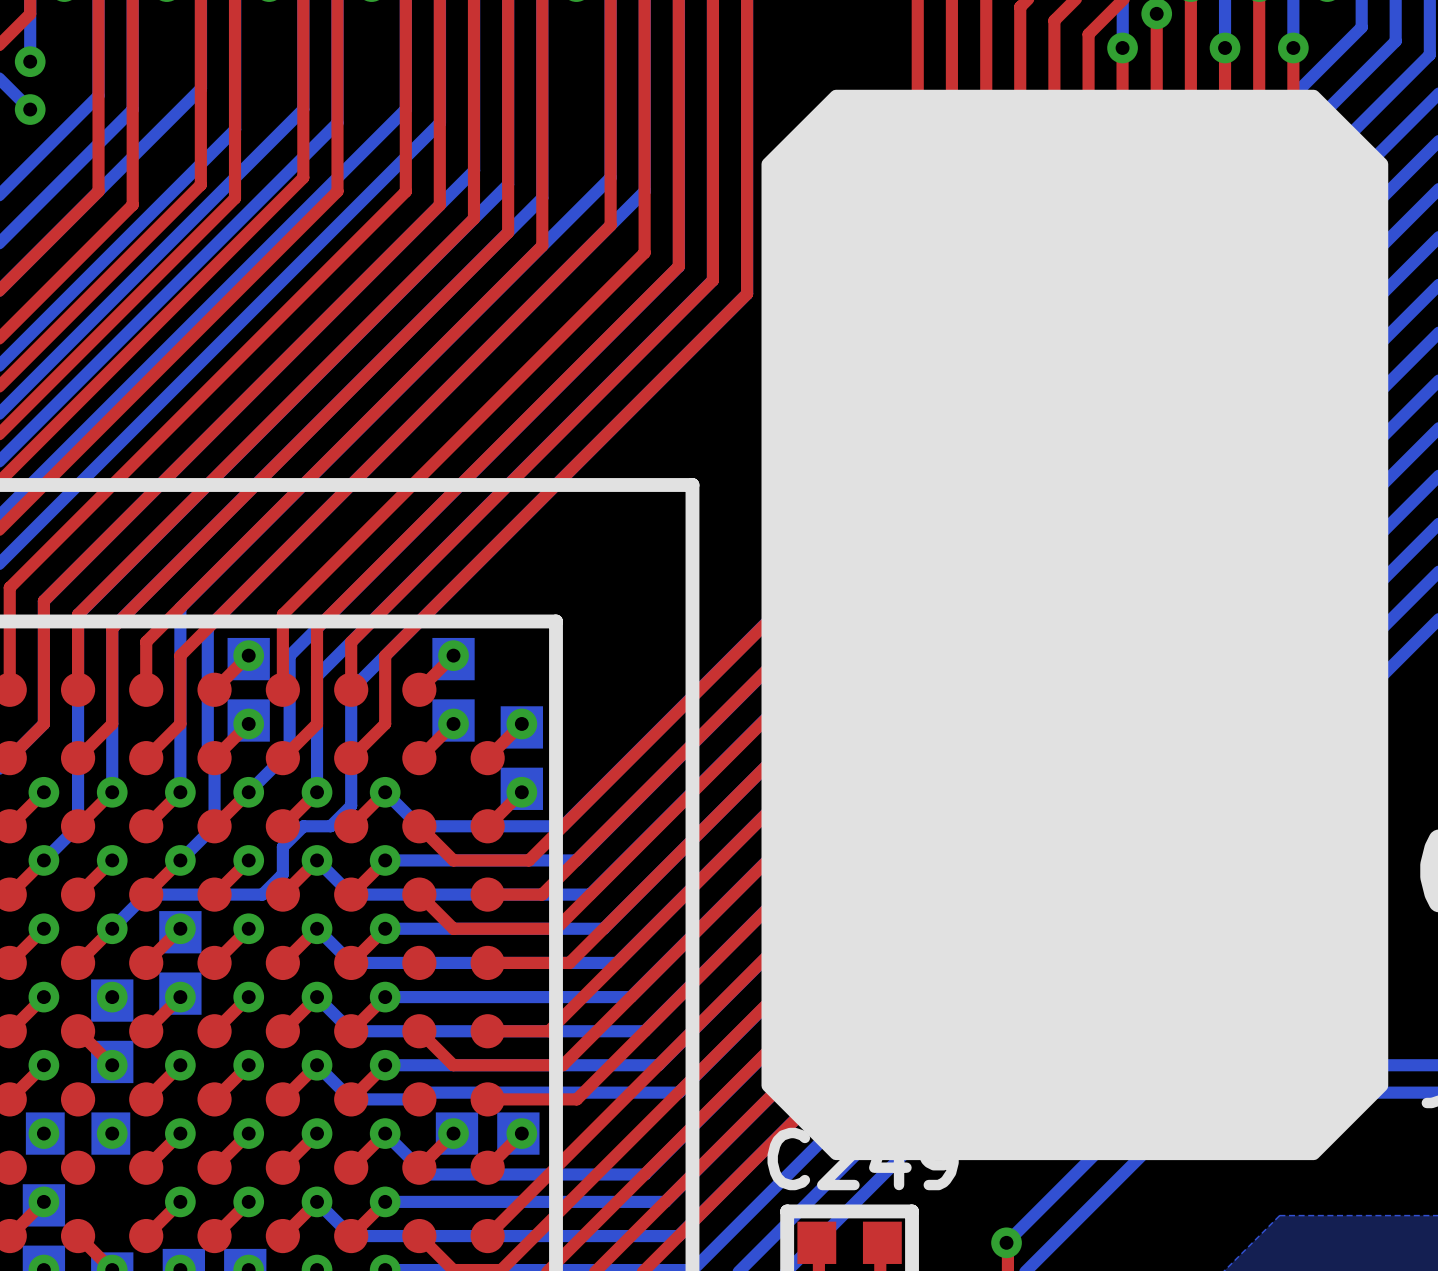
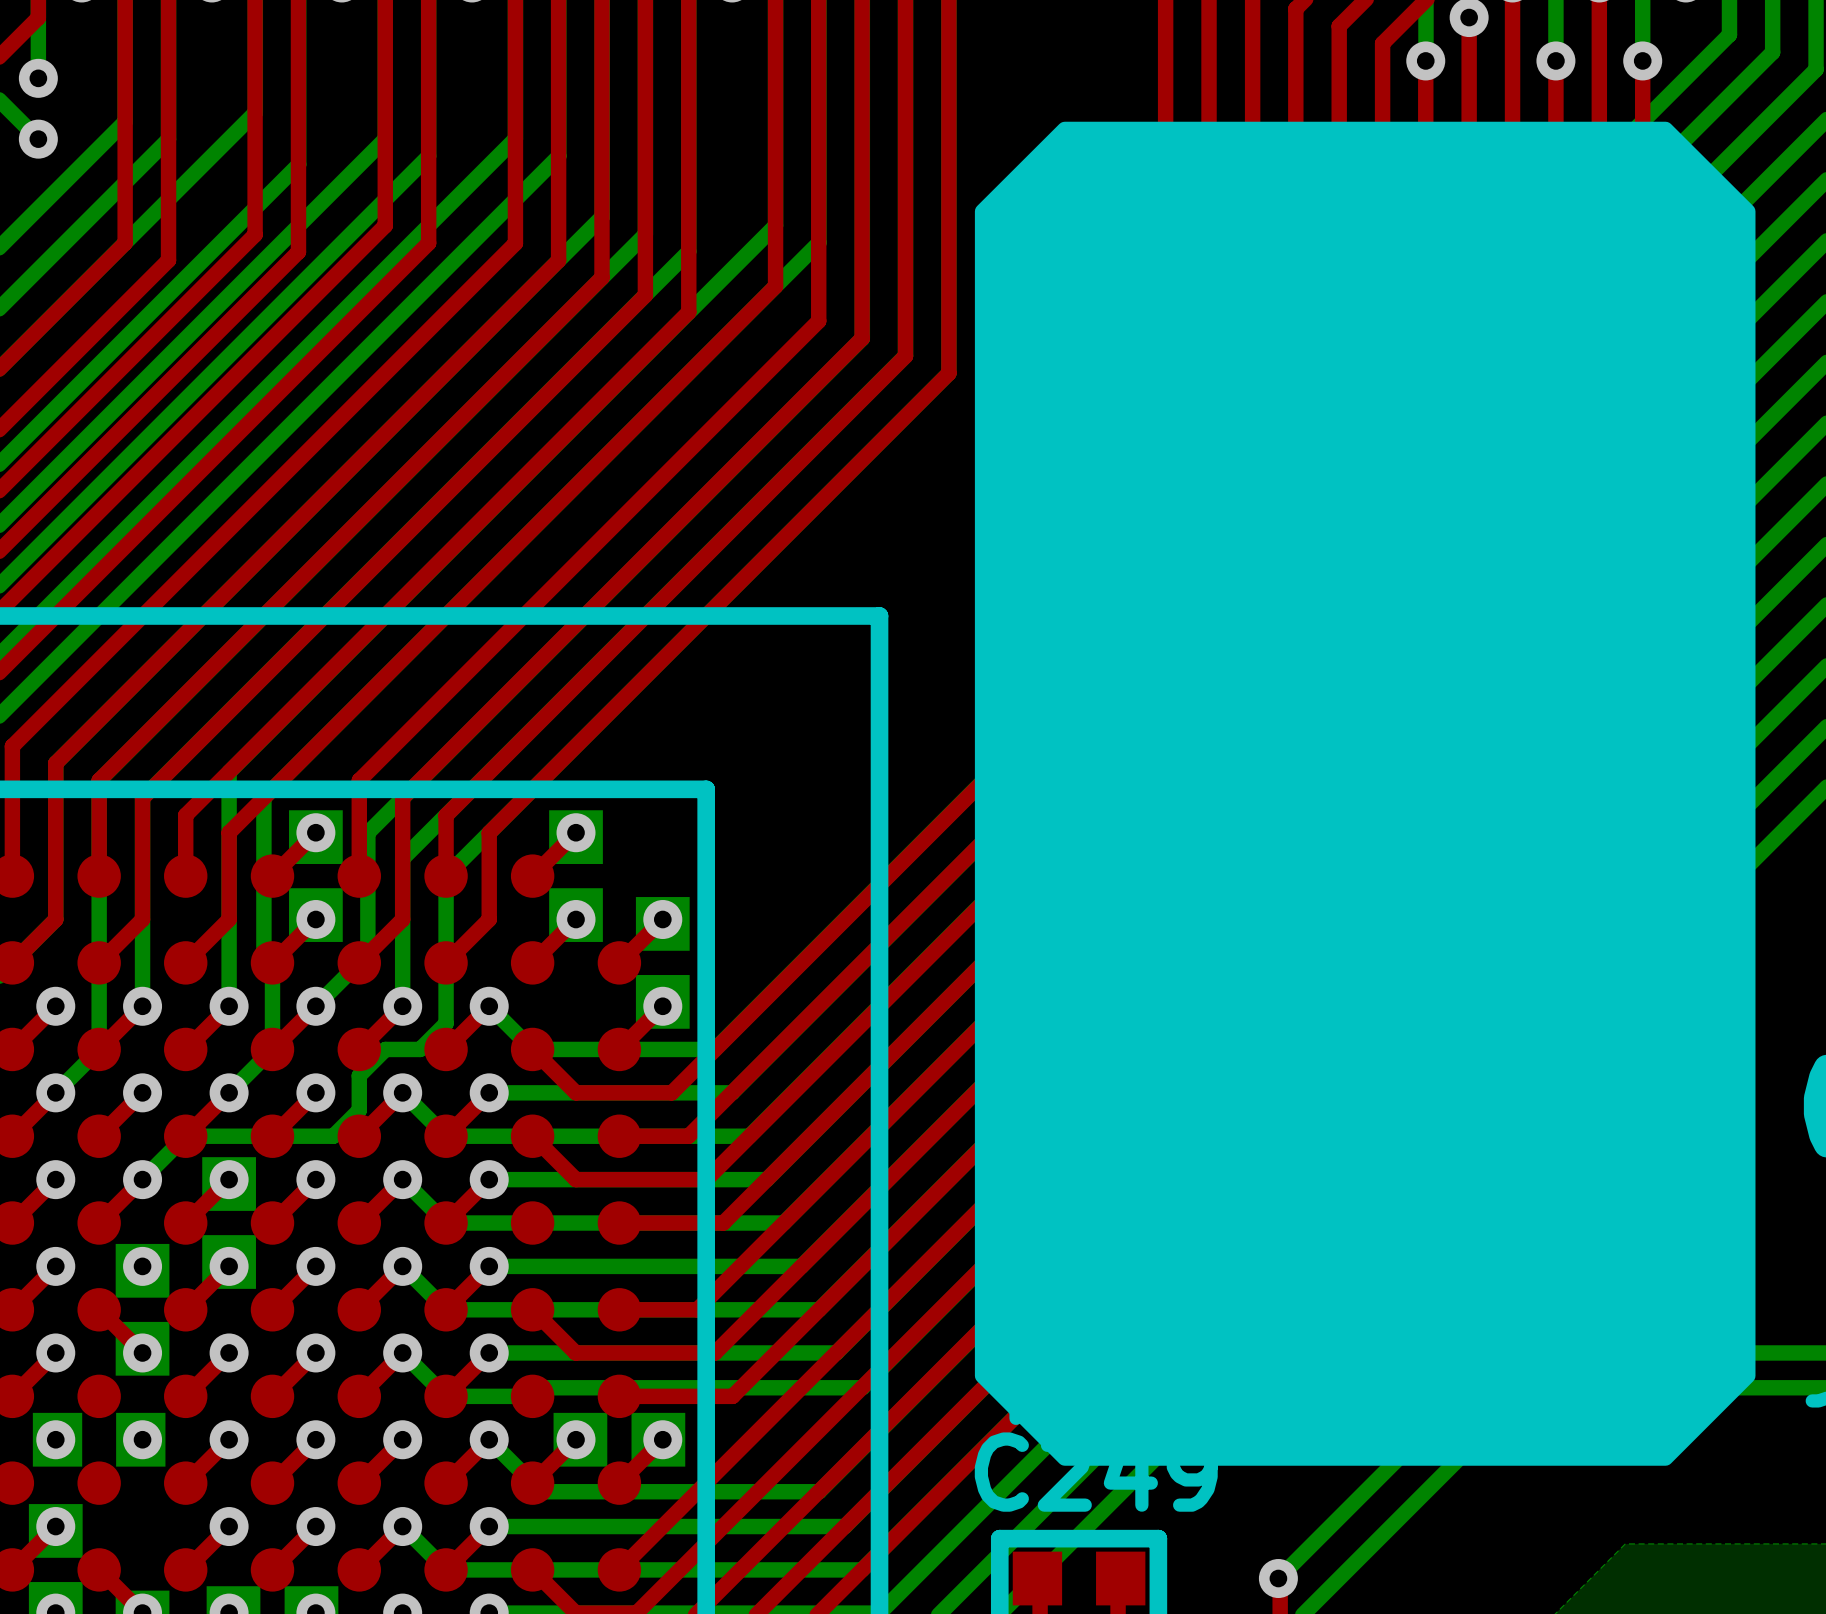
drawing shape: [761, 89, 1389, 1161] -> [974, 121, 1756, 1466]

